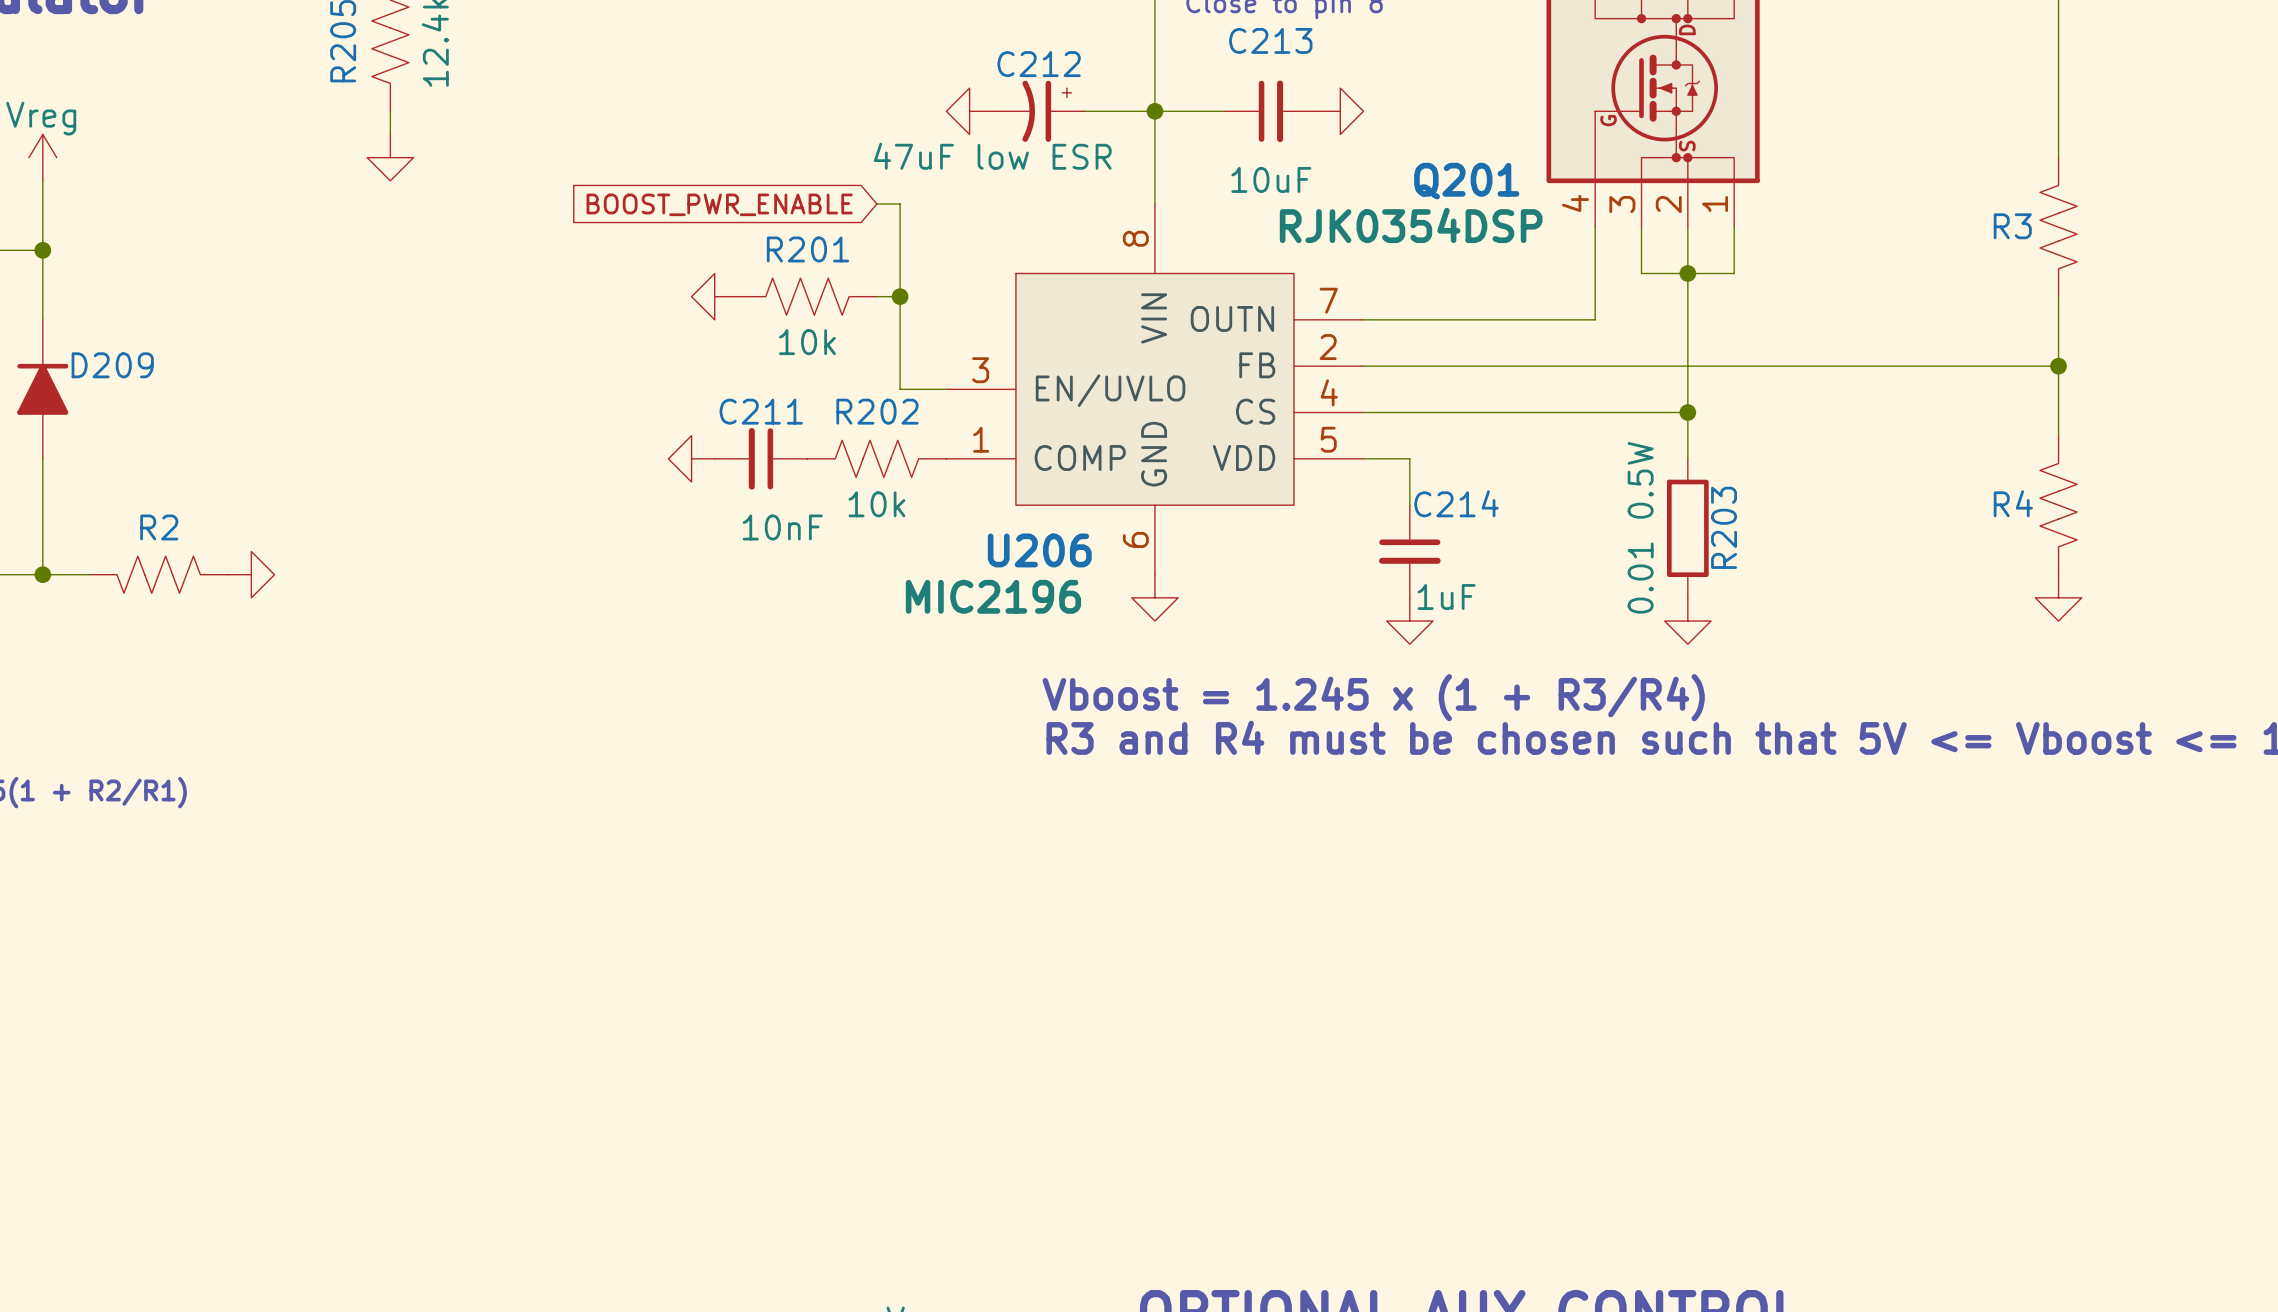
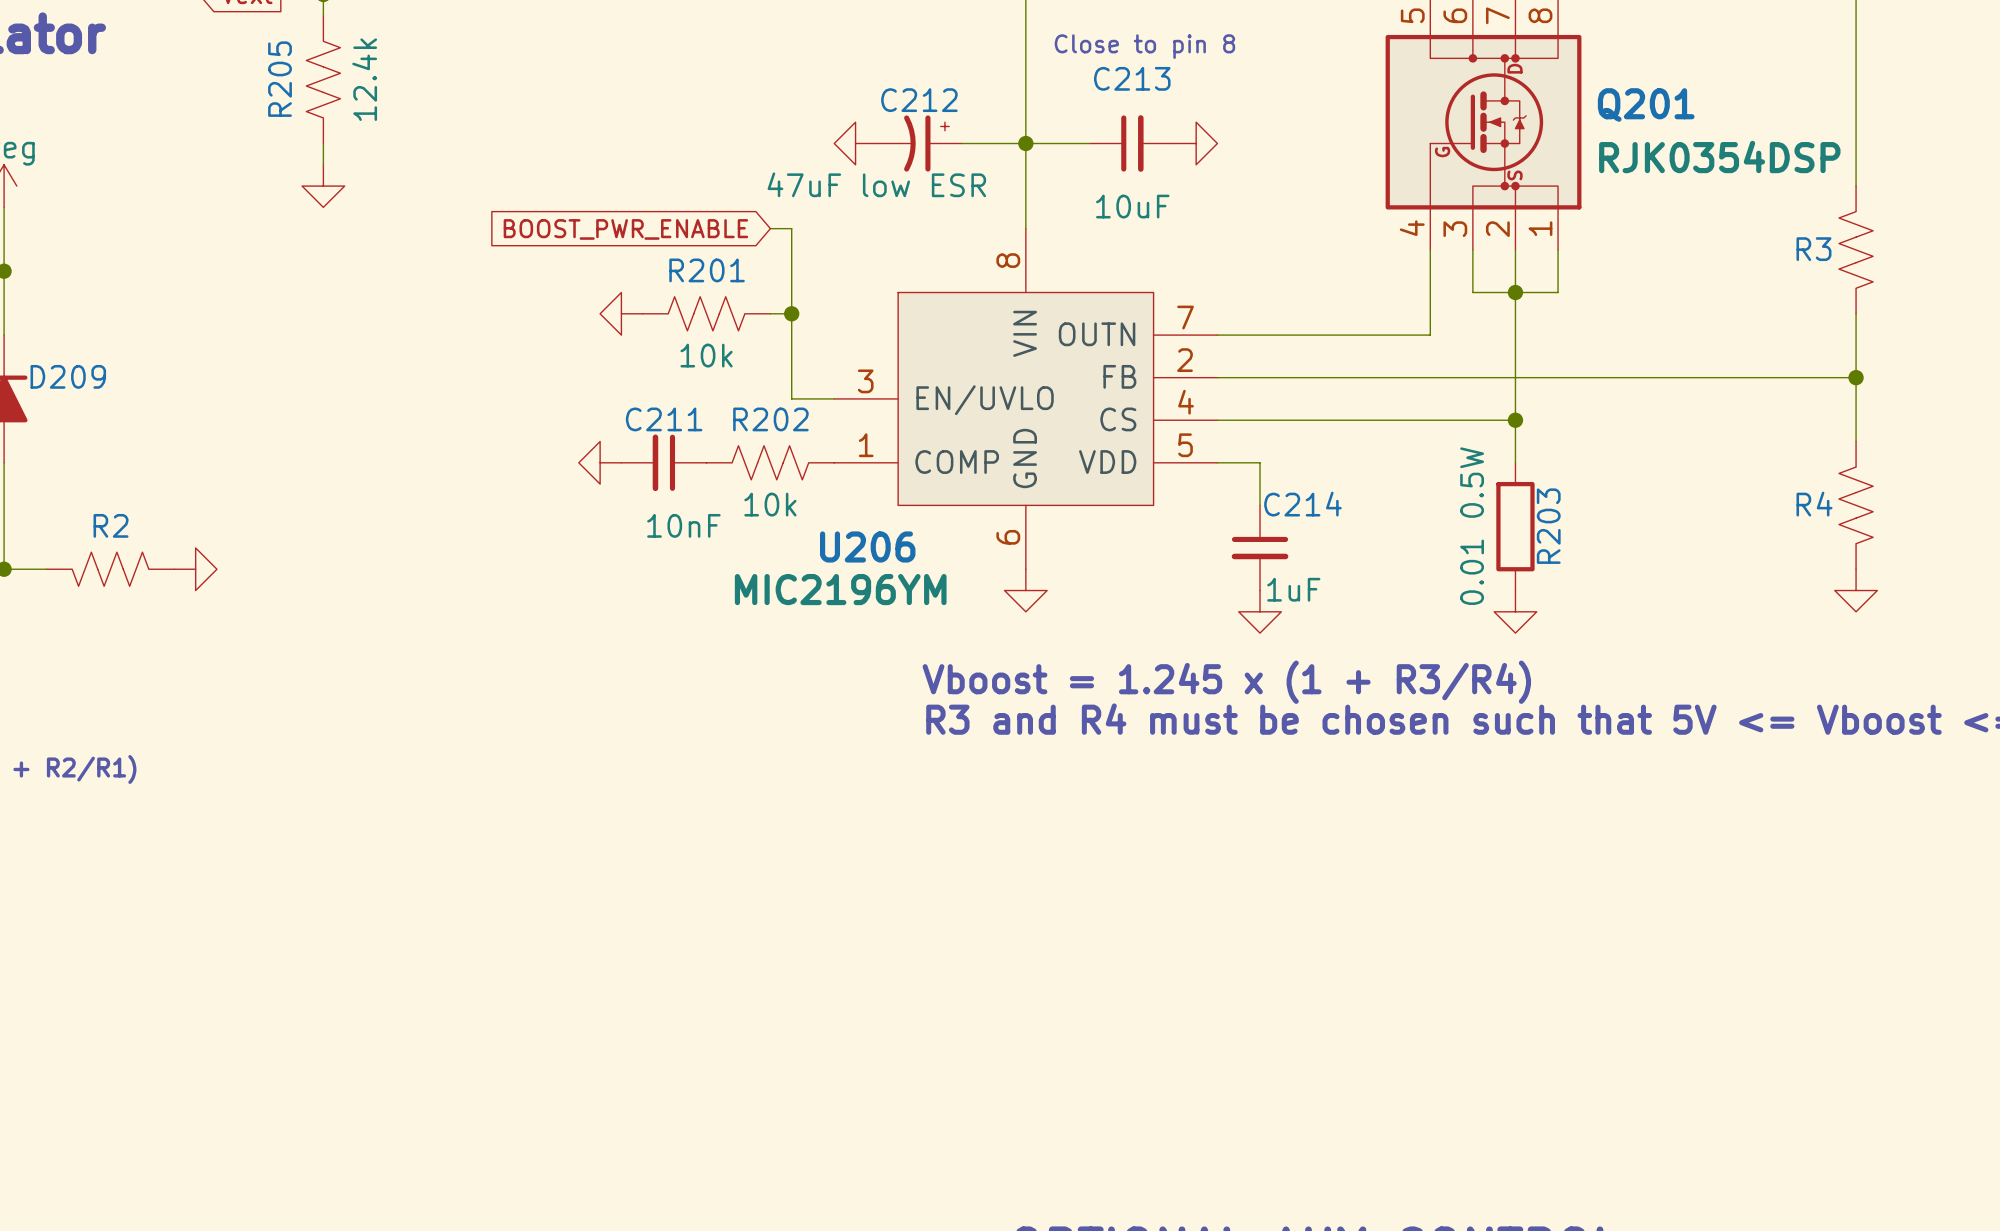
Q201 name position: Q201 (1466, 181) -> Q201 (1646, 104)
Q201 value position: RJK0354DSP (1411, 225) -> RJK0354DSP (1719, 156)
U206 name position: U206 (1039, 550) -> U206 (867, 546)
U206 value: MIC2196 (993, 596) -> MIC2196YM (840, 589)

